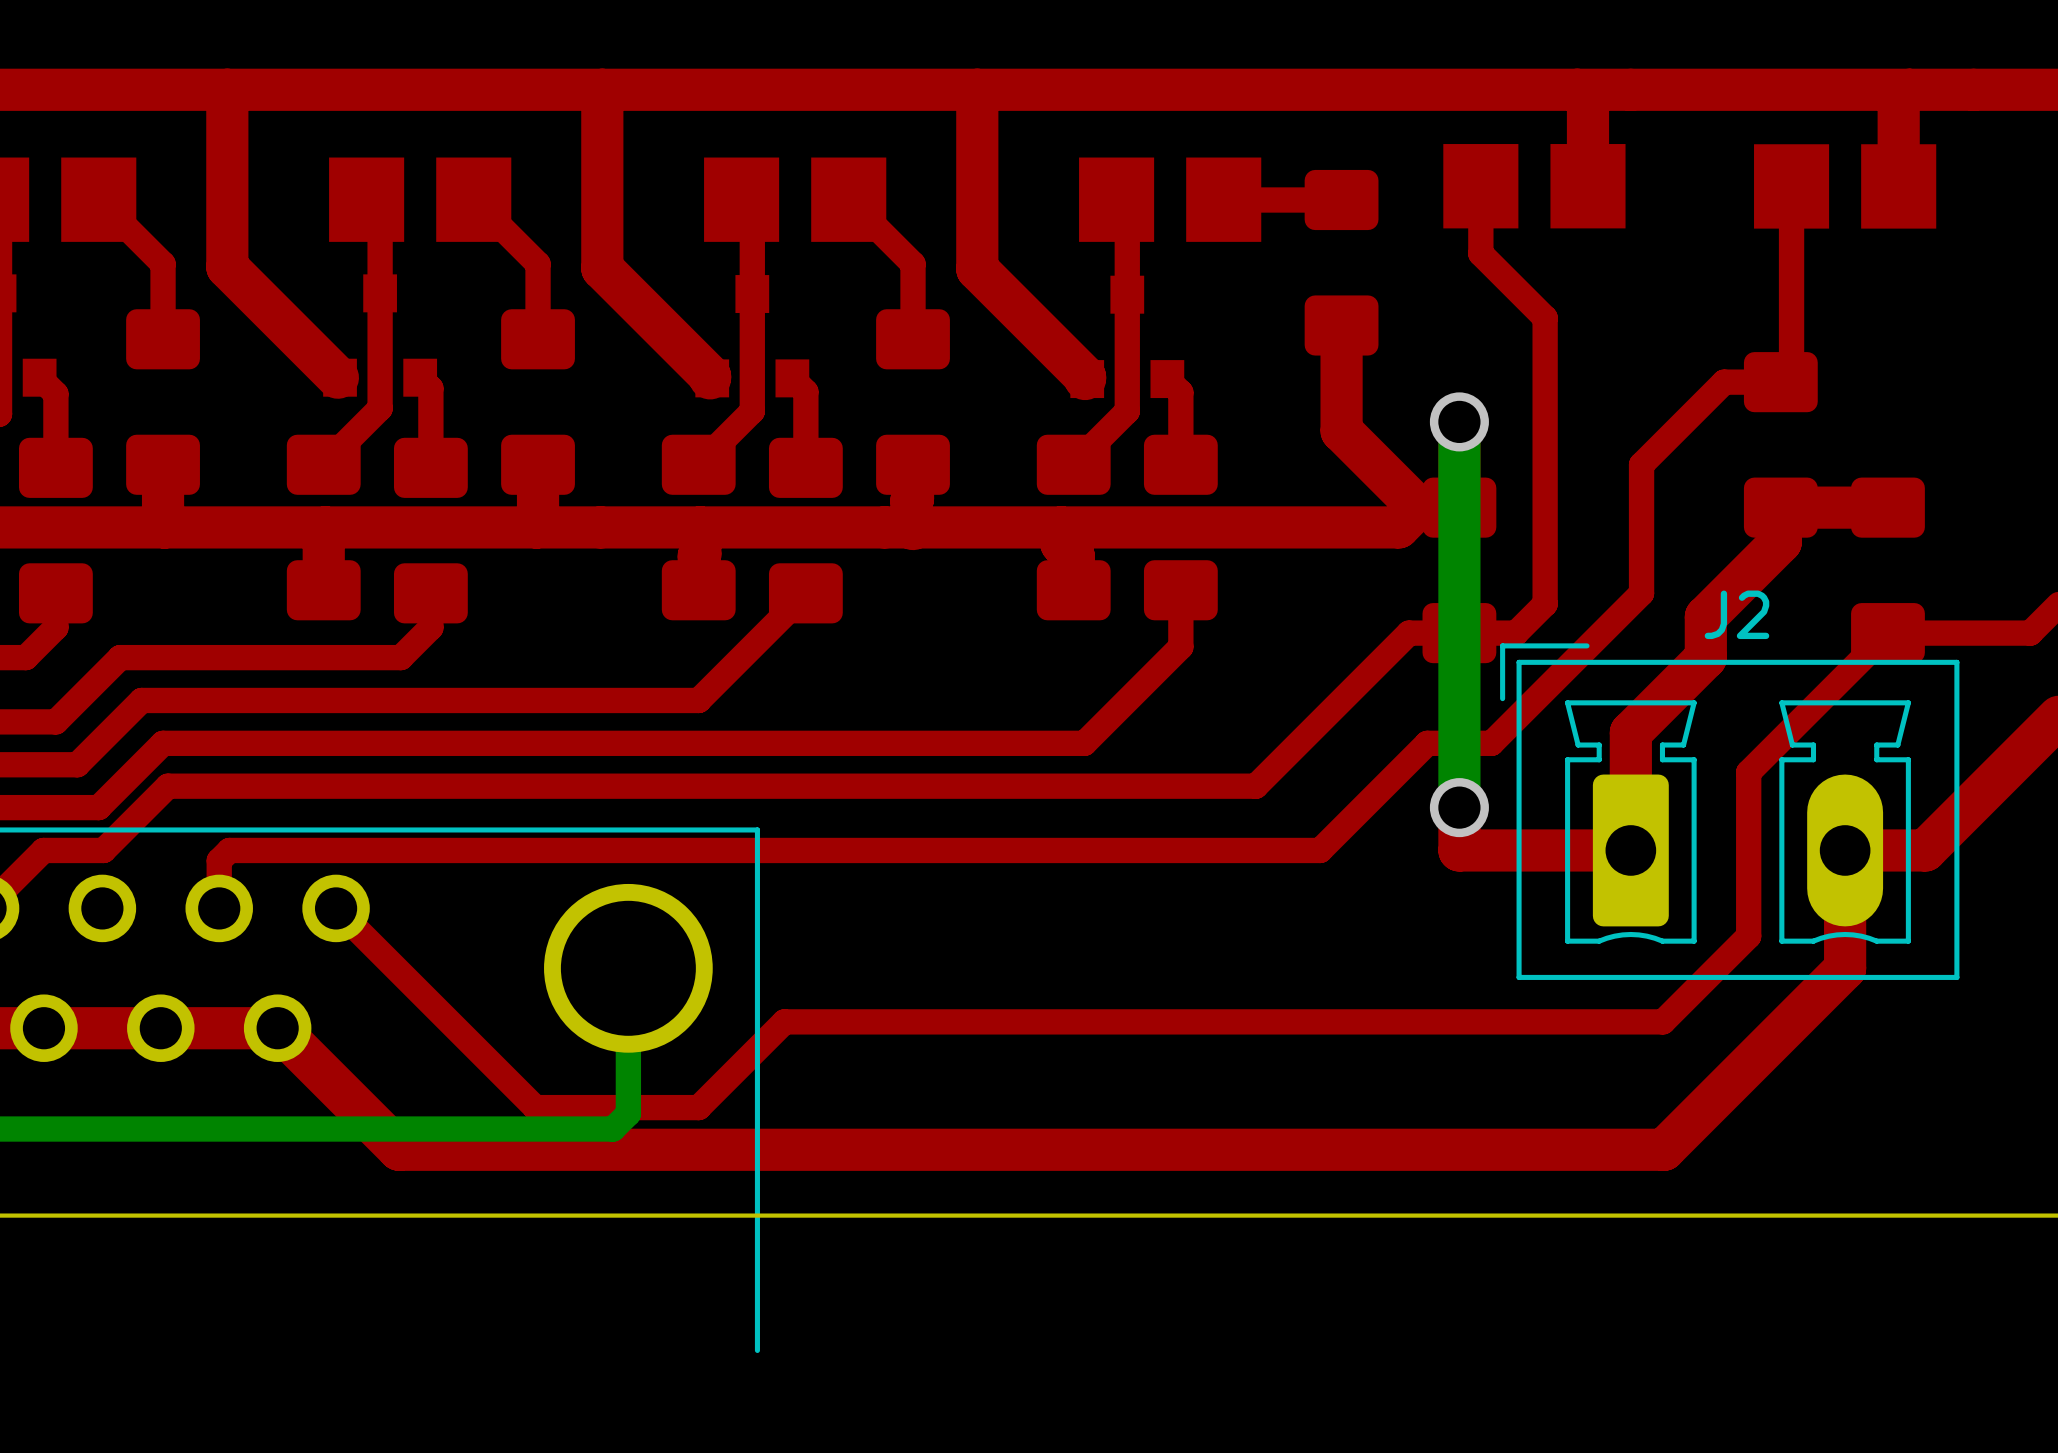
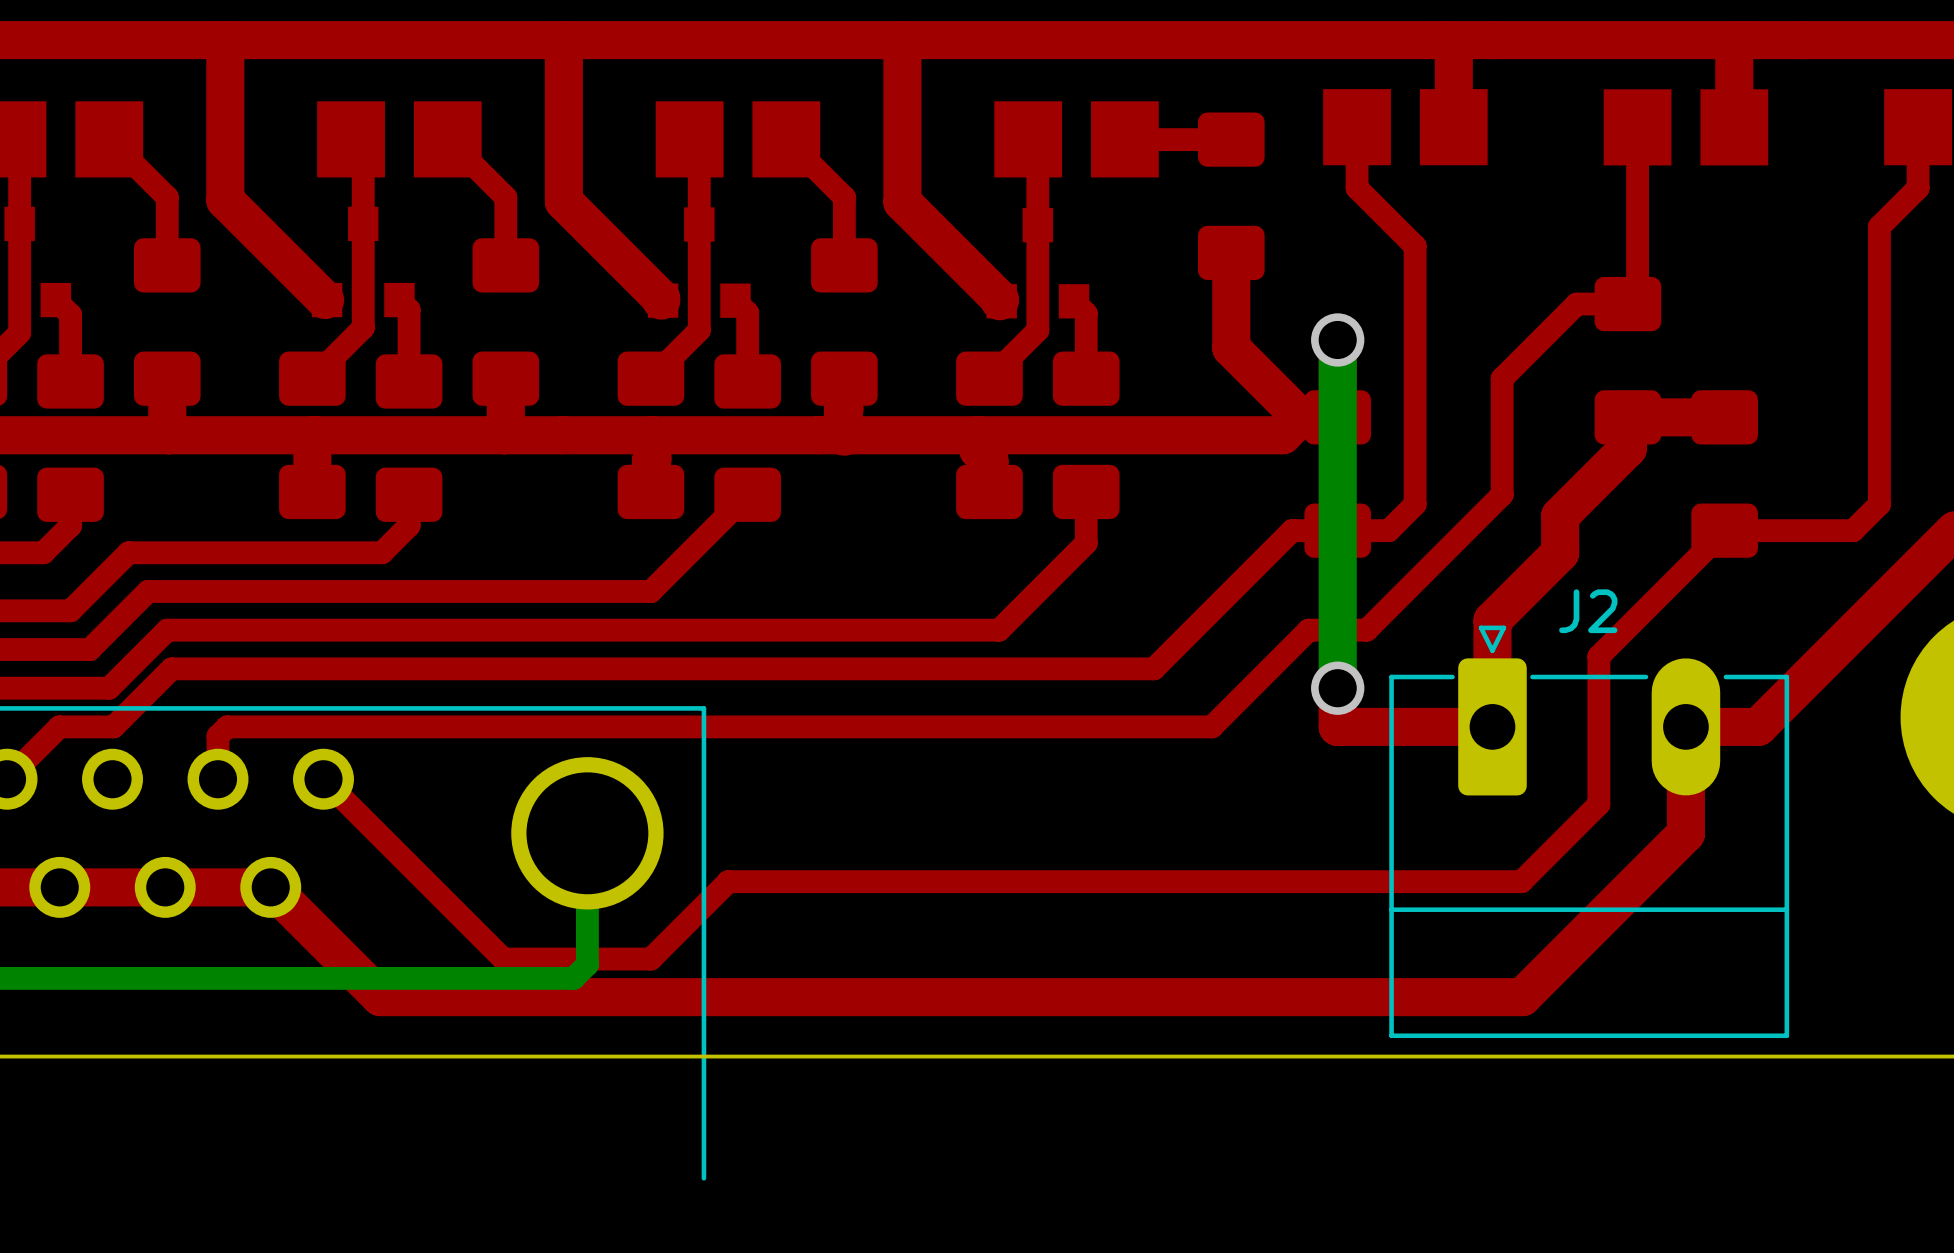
J2 footprint: [1500, 643, 1960, 980] -> [1389, 625, 1790, 1039]

